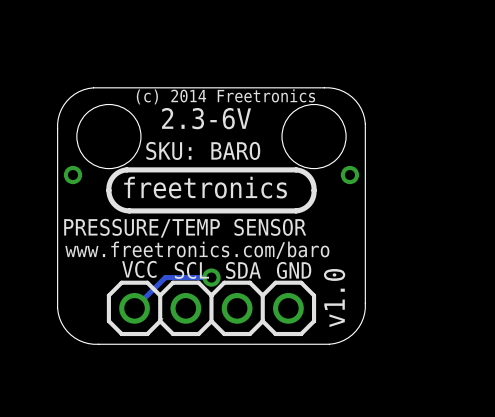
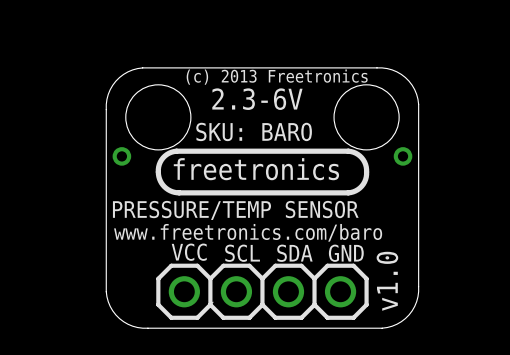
text: (c) 2014 Freetronics (225, 96) -> (c) 2013 Freetronics (277, 77)
track: (211, 277) (165, 277) (134, 308) -> none
via: (211, 277) -> none

